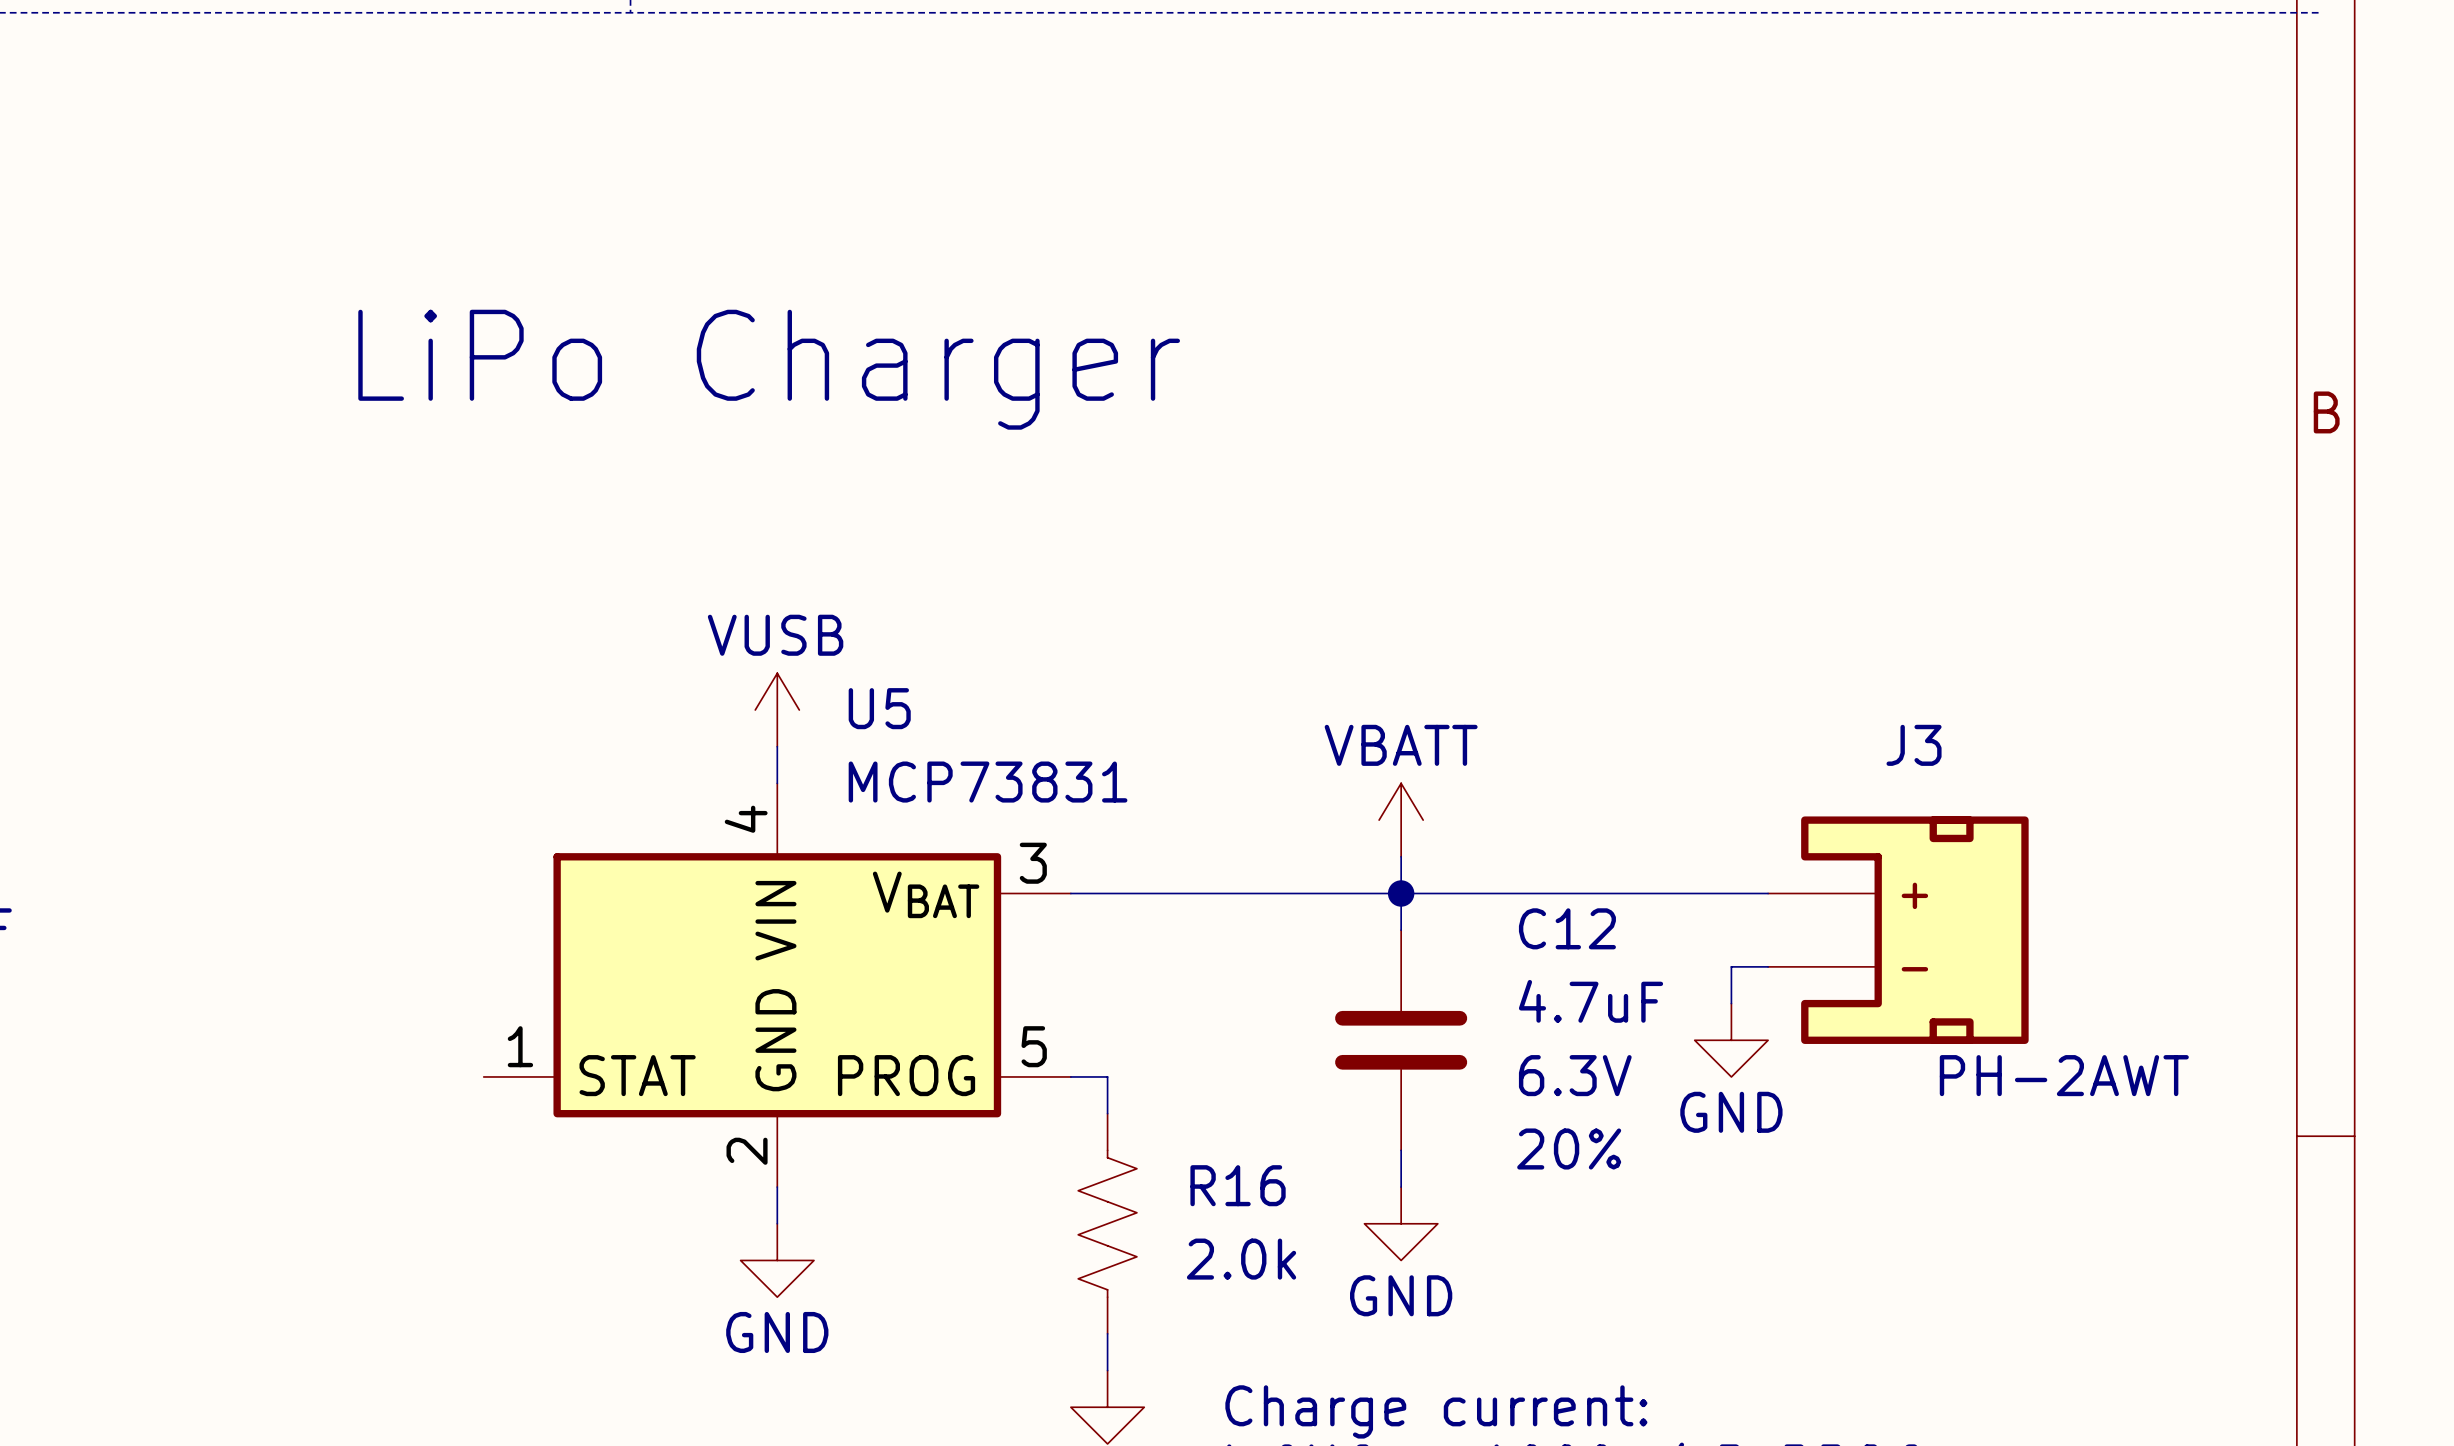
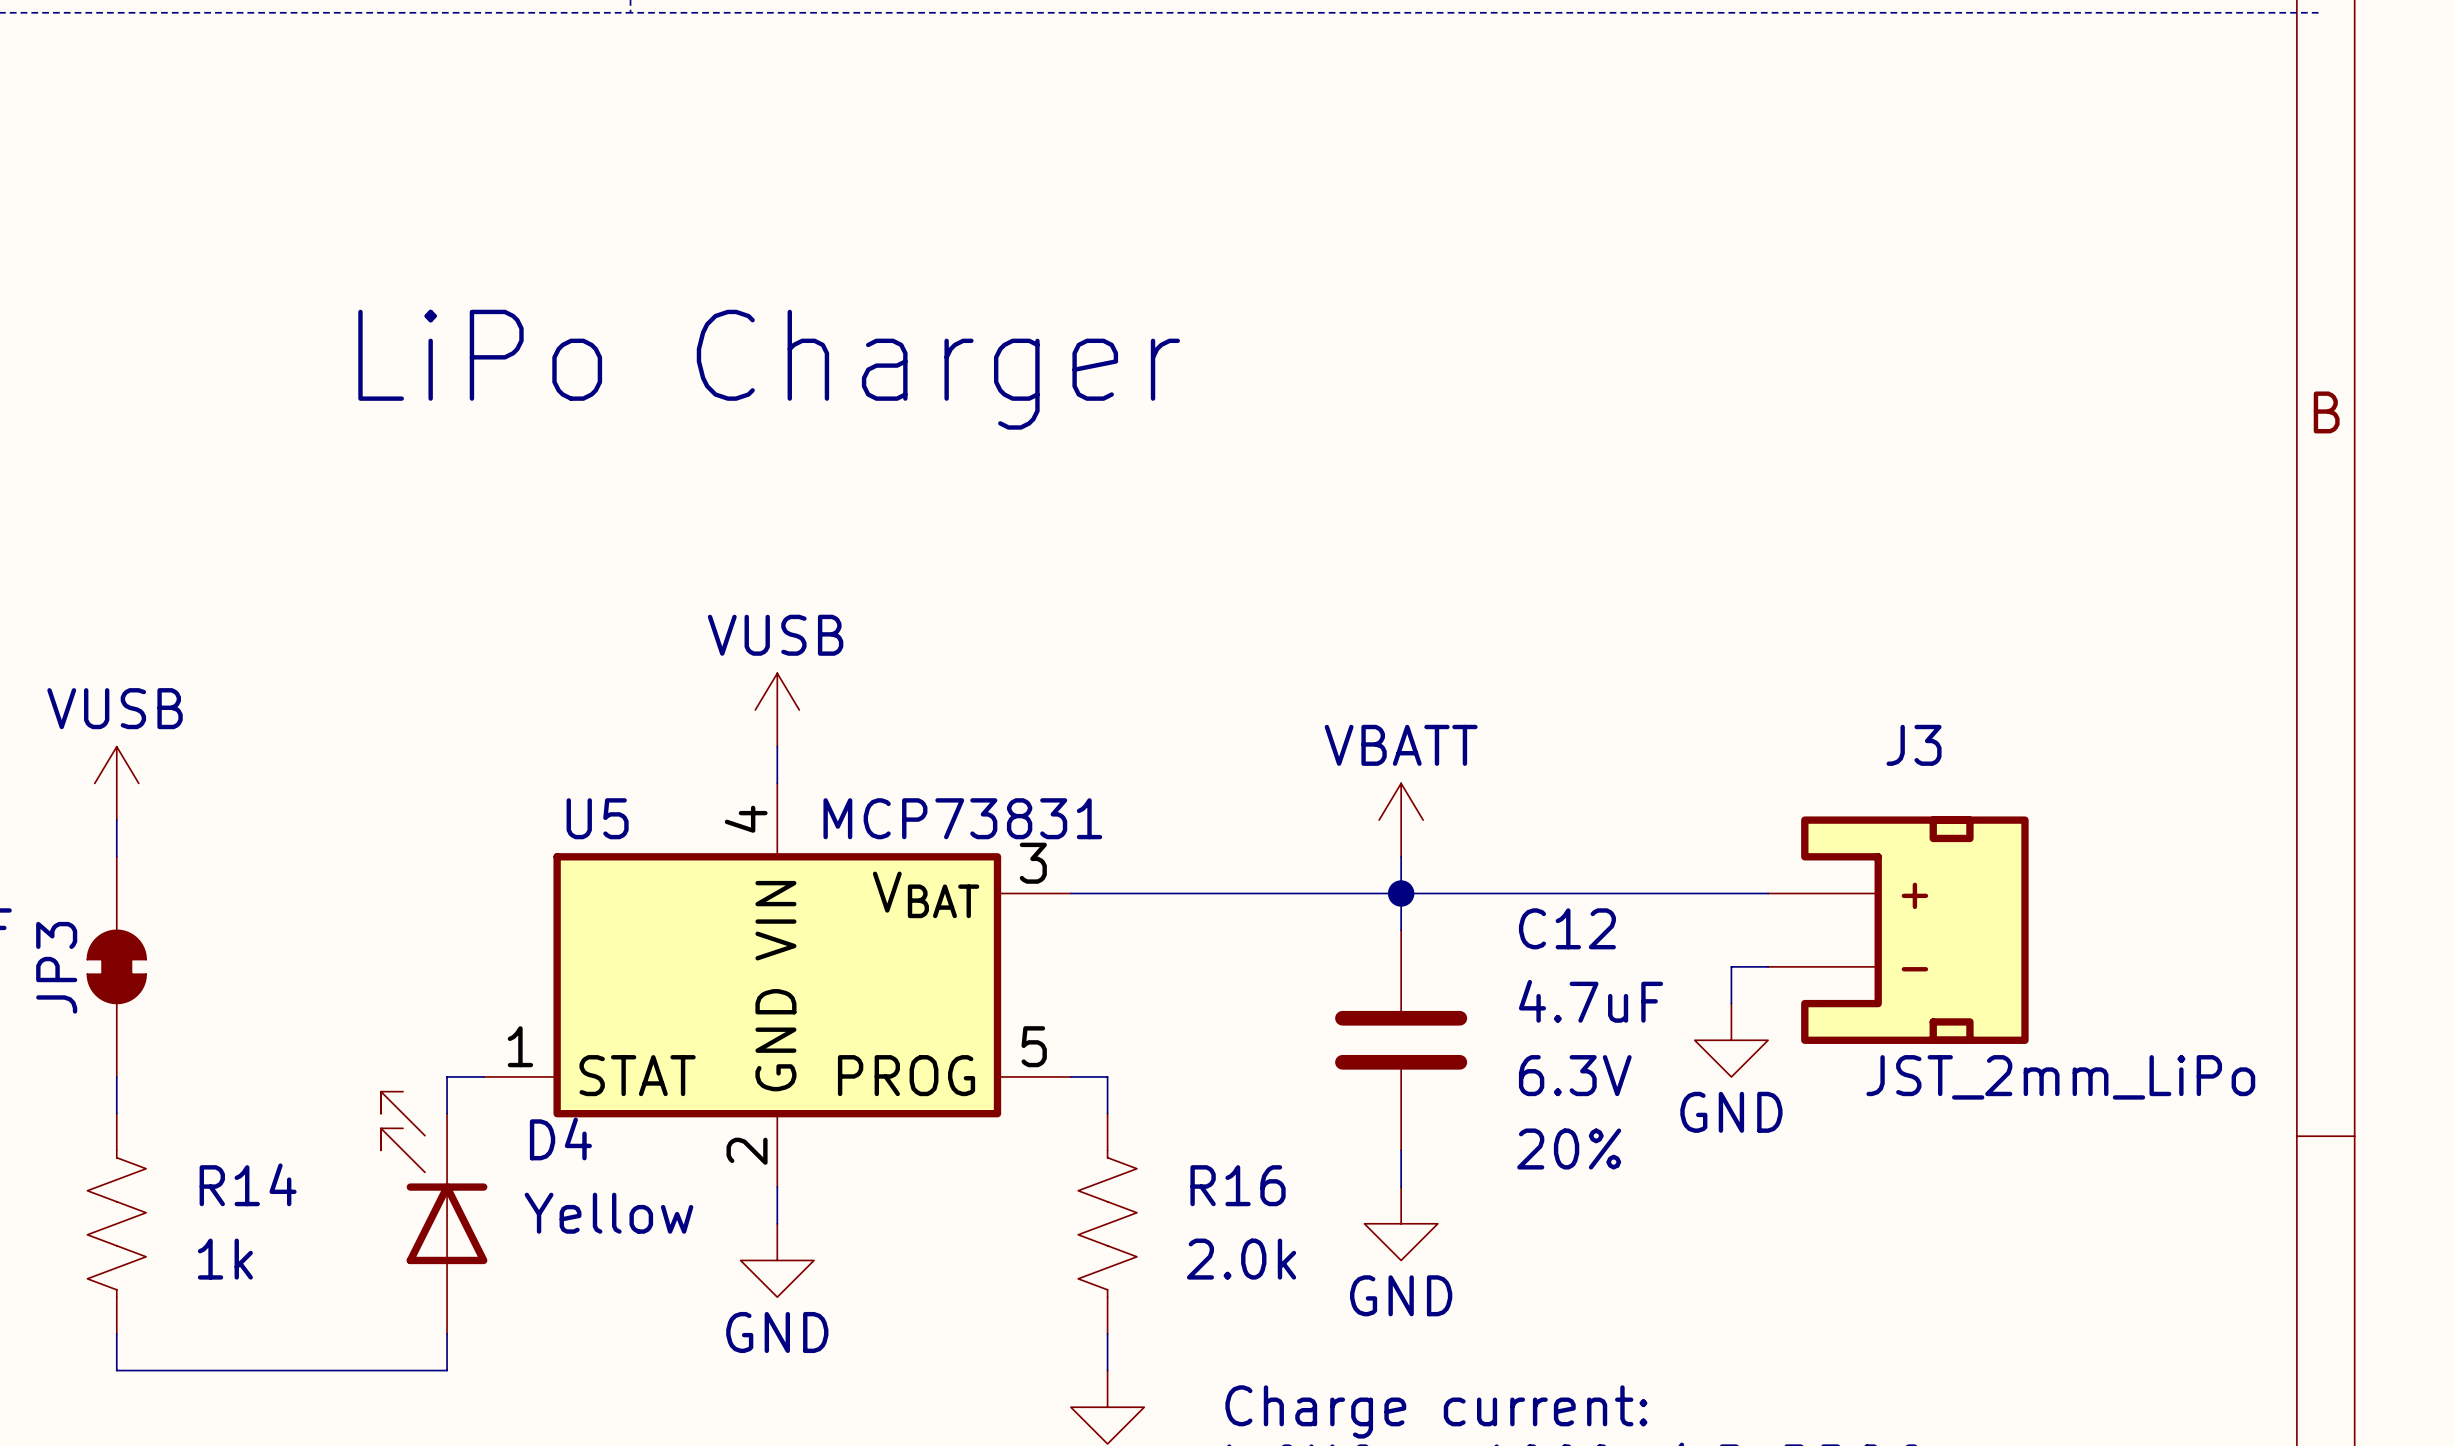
U5 name position: U5 (879, 708) -> U5 (597, 818)
U5 value position: MCP73831 (988, 782) -> MCP73831 (962, 818)
power symbol: none -> VUSB (116, 783)
wire: none -> (116, 820) (116, 856)
JP3: none -> (116, 966)
J3 value: PH-2AWT (2064, 1075) -> JST_2mm_LiPo (2060, 1077)
wire: none -> (116, 1076) (116, 1113)
wire: none -> (483, 1076) (447, 1076) (447, 1113)
D4: none -> Yellow (434, 1212)
R14: none -> 1k (116, 1223)
wire: none -> (116, 1333) (116, 1370) (447, 1370) (447, 1333)

